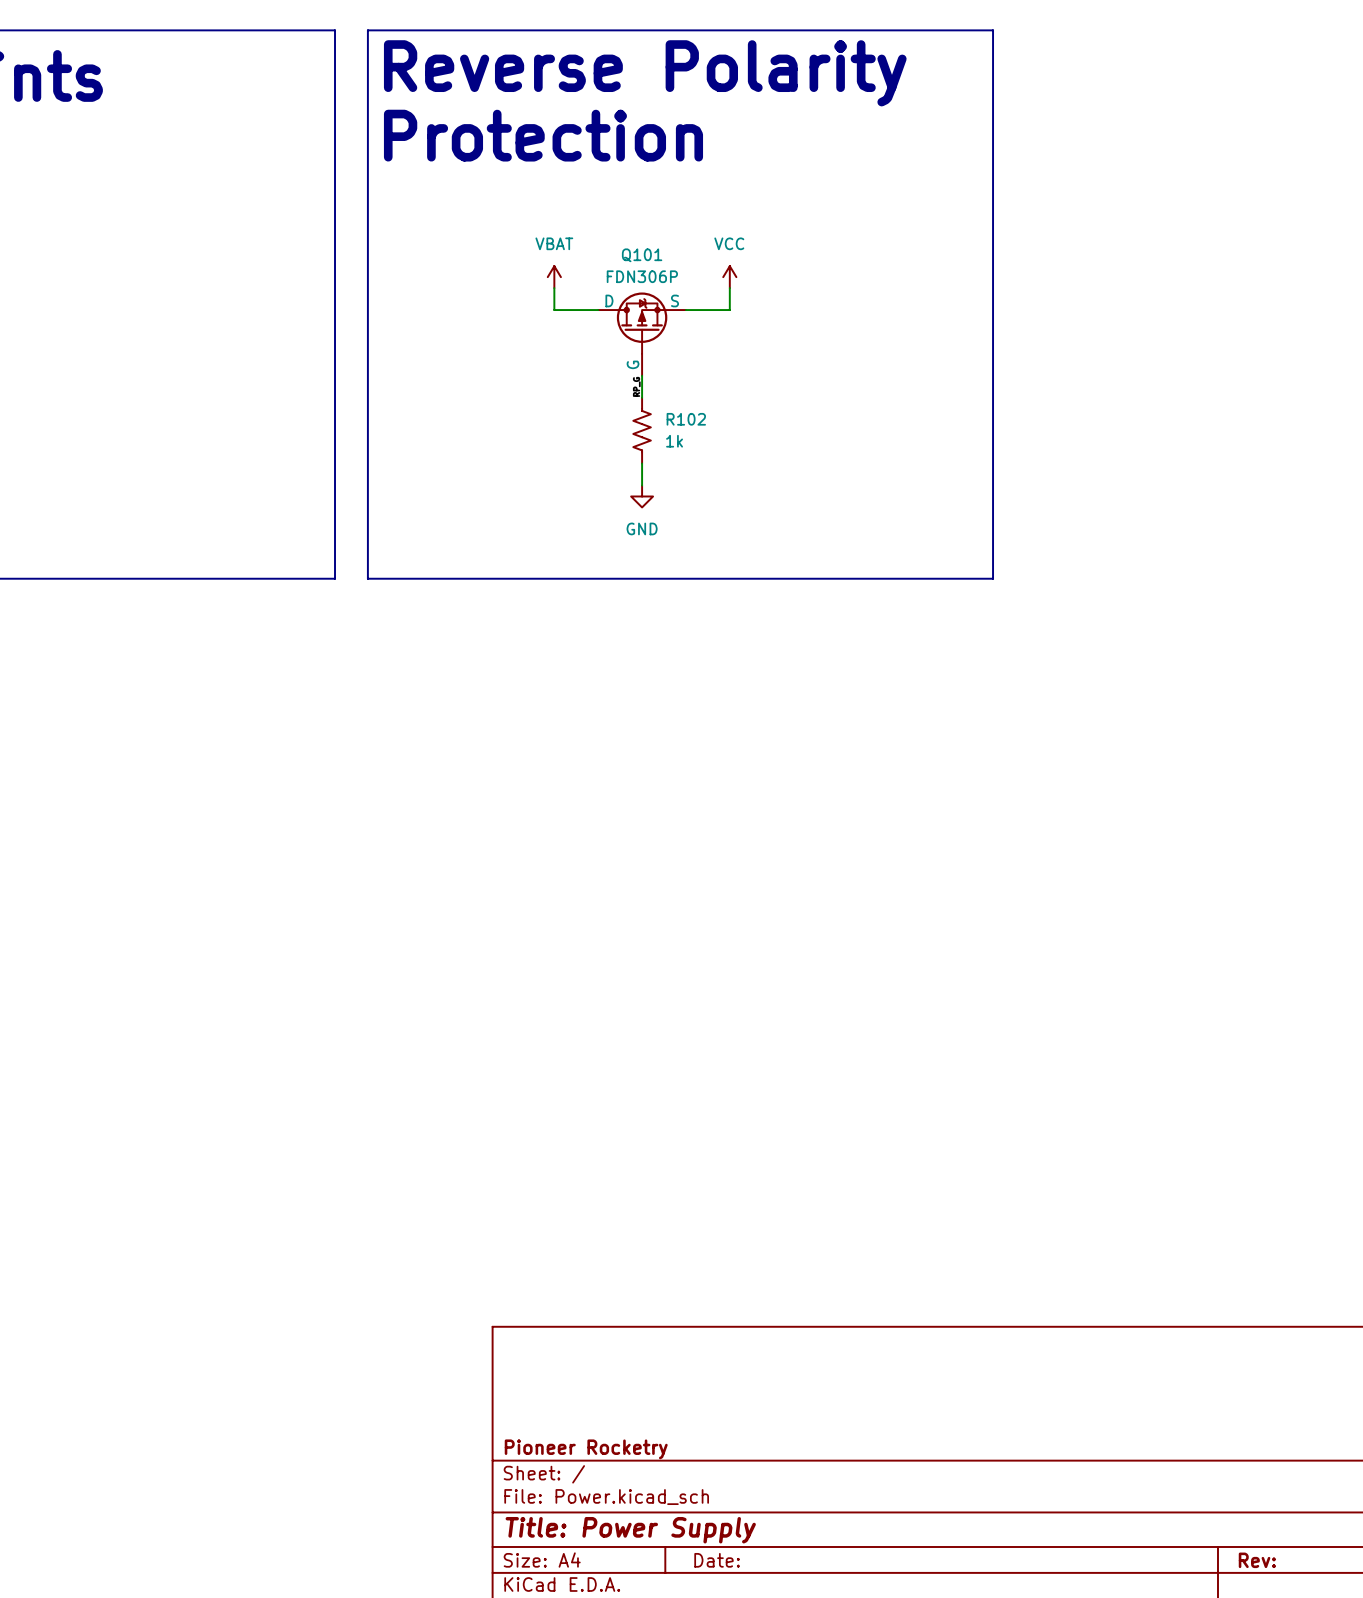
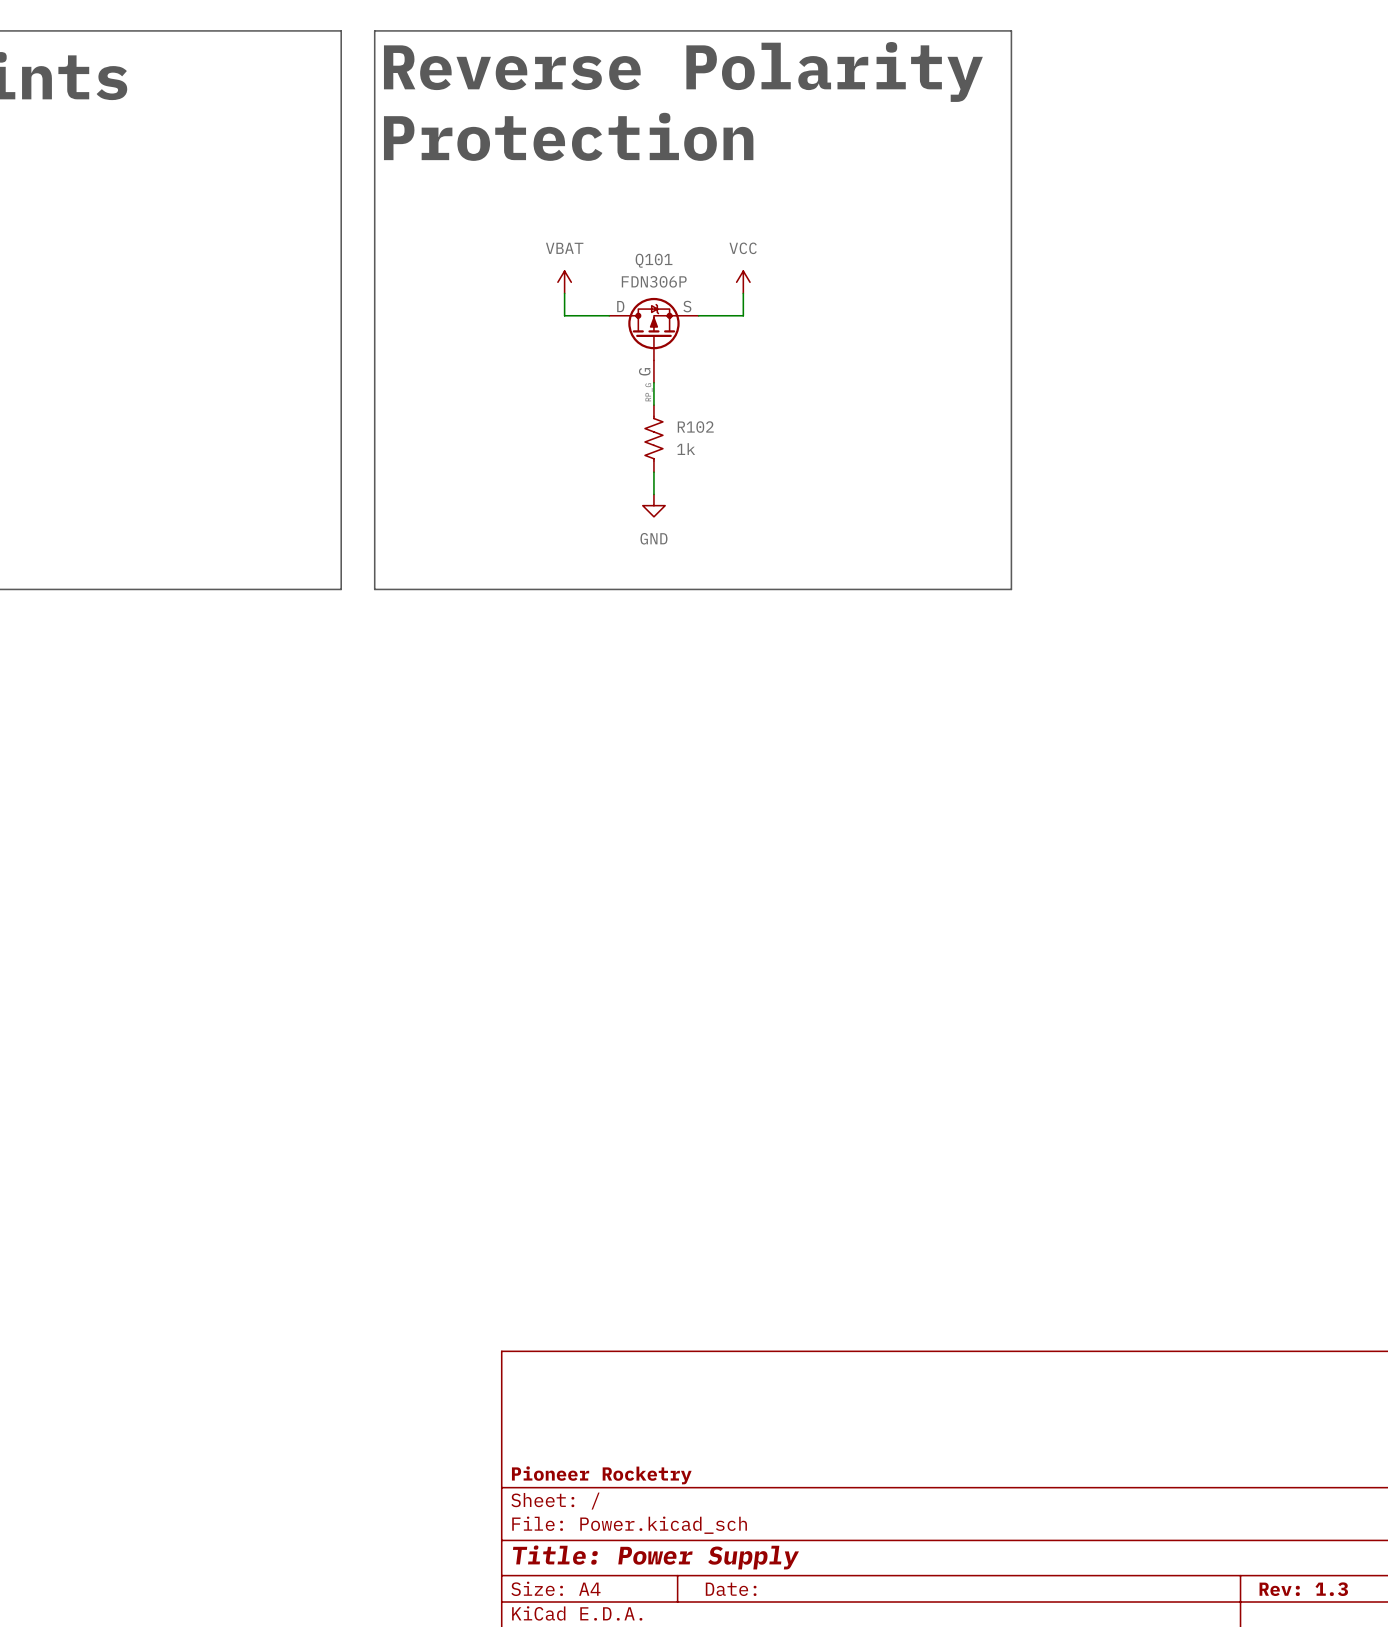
title block: Rev: (1257, 1560) -> Rev: 1.3 (1303, 1589)

